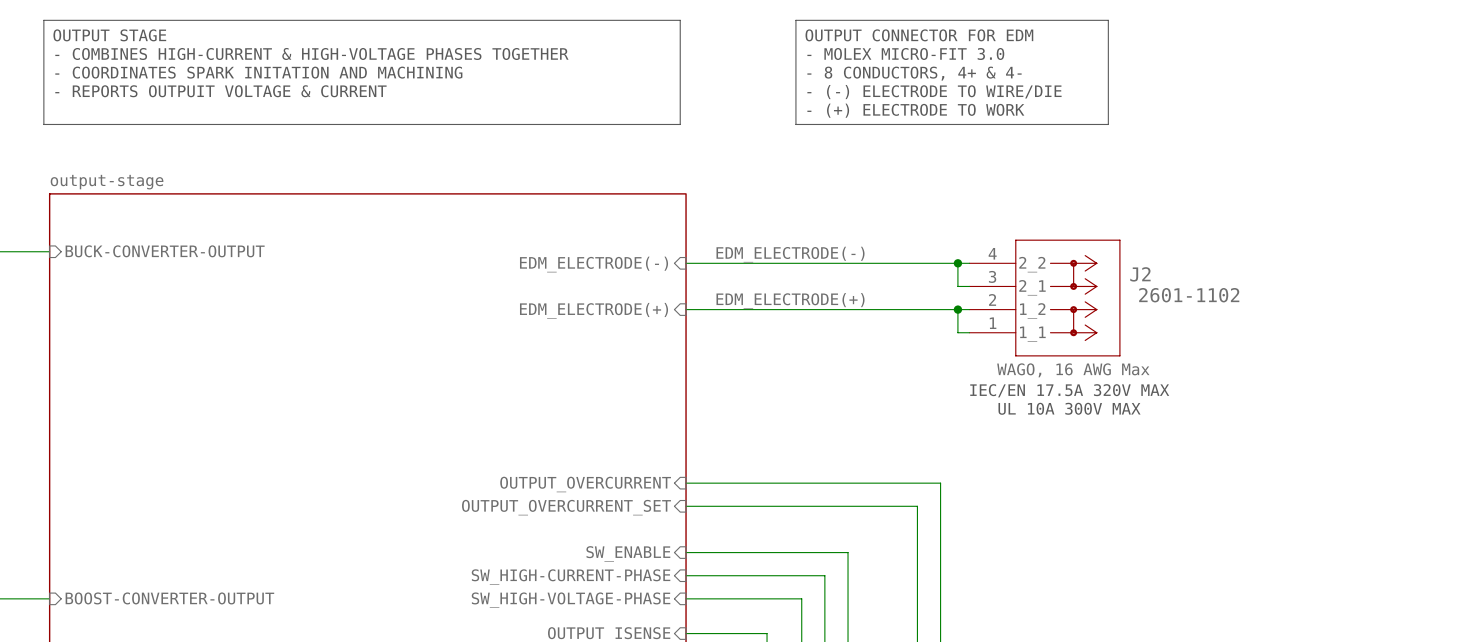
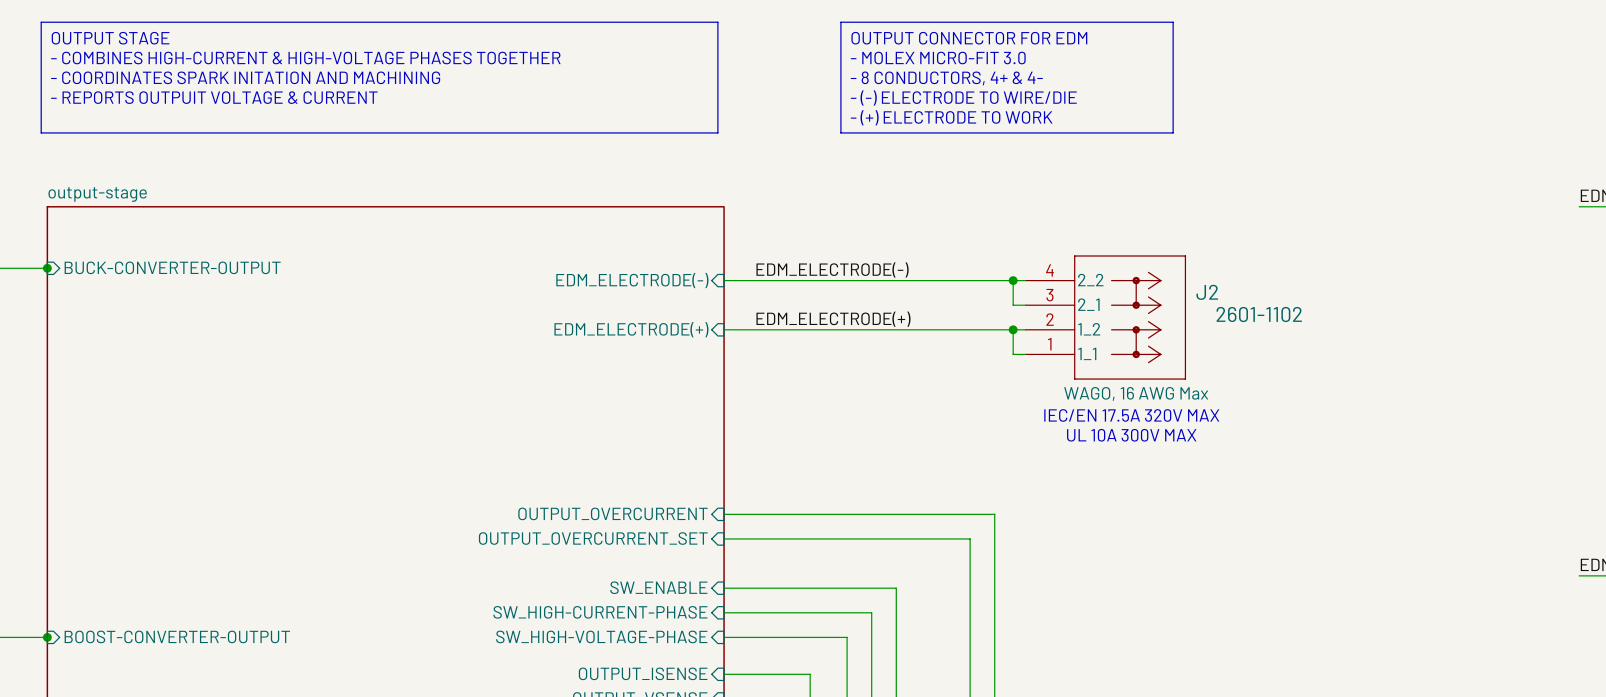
junction: none -> (47, 268)
junction: none -> (47, 637)

